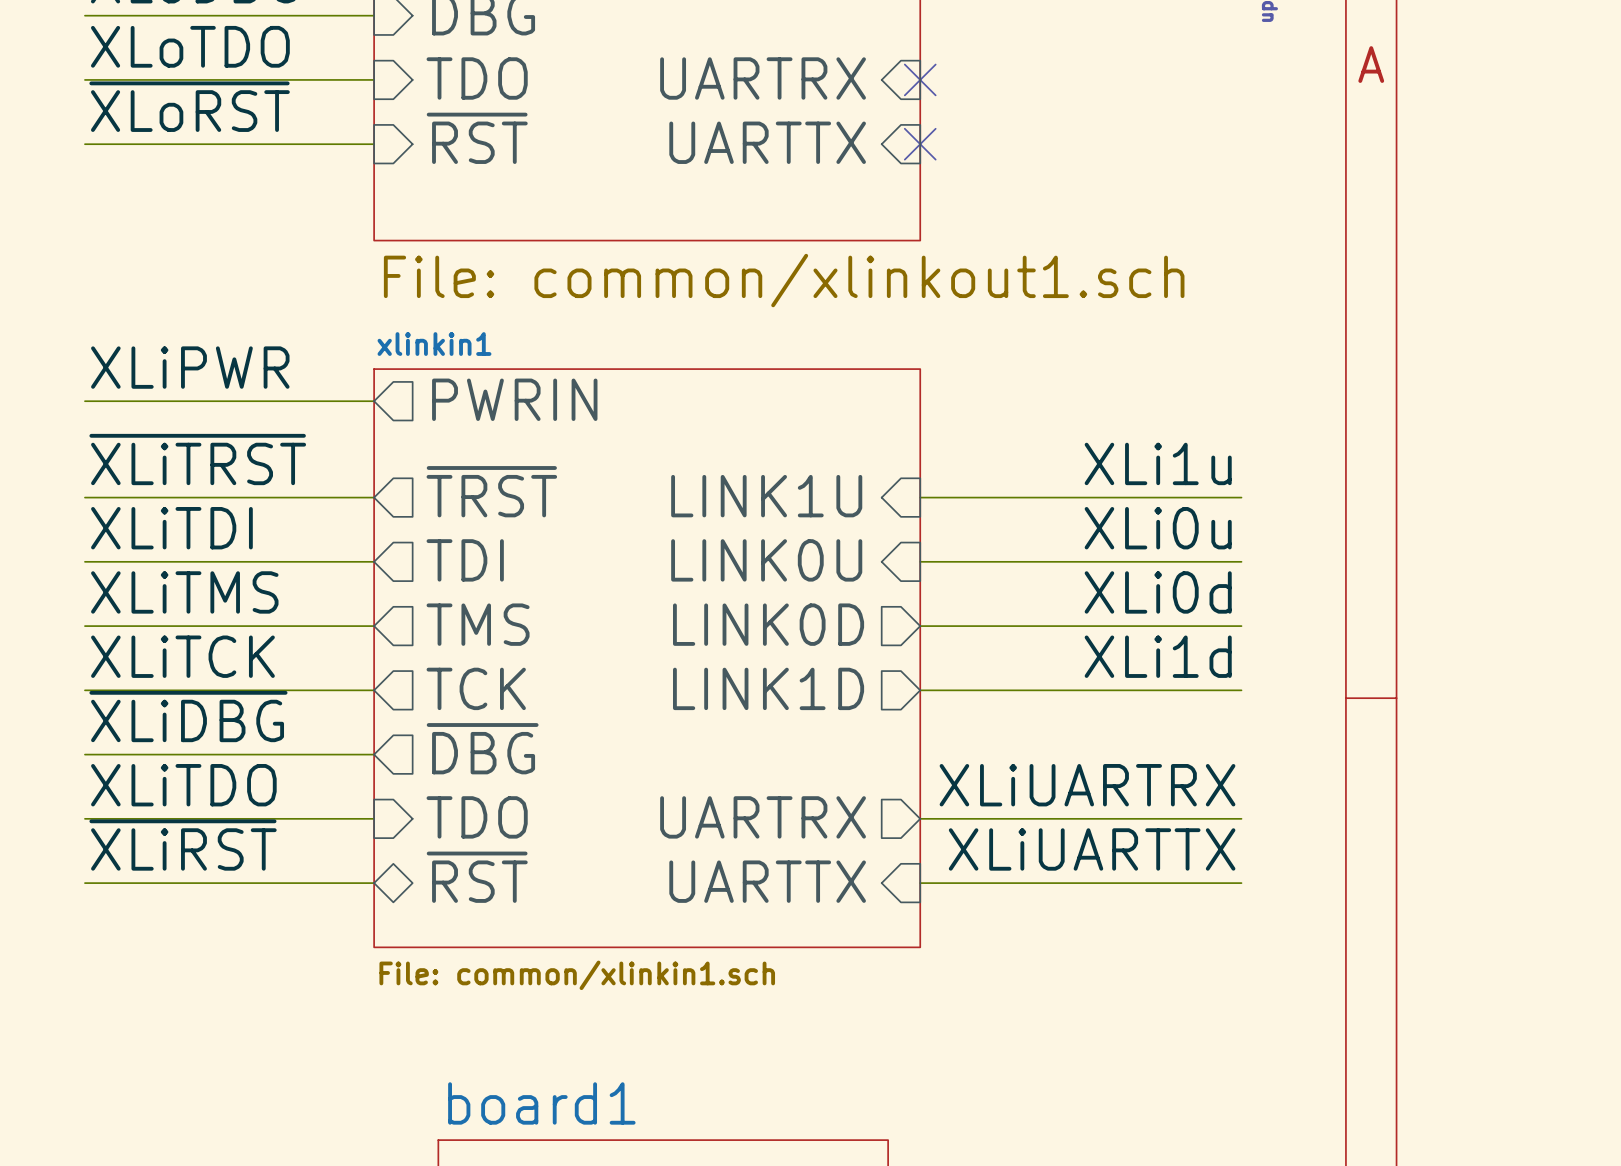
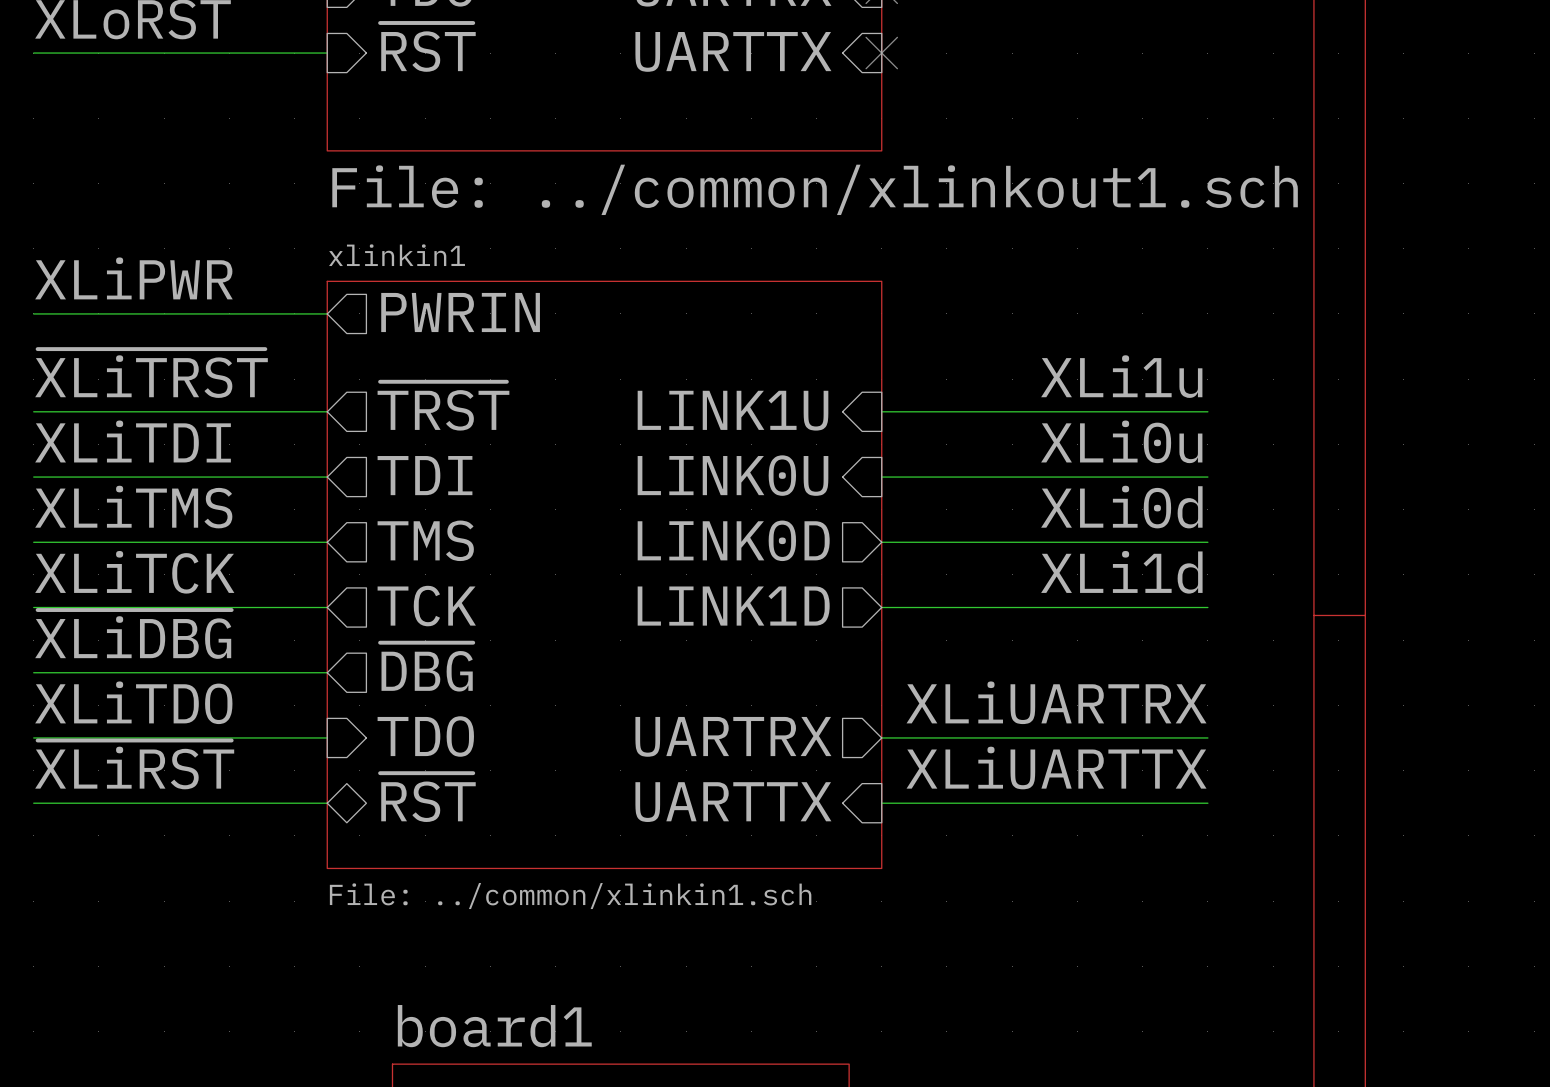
sheet value: File: common/xlinkout1.sch (784, 280) -> File: ../common/xlinkout1.sch (815, 189)
sheet xlinkin1 value: File: common/xlinkin1.sch (577, 975) -> File: ../common/xlinkin1.sch (570, 896)

